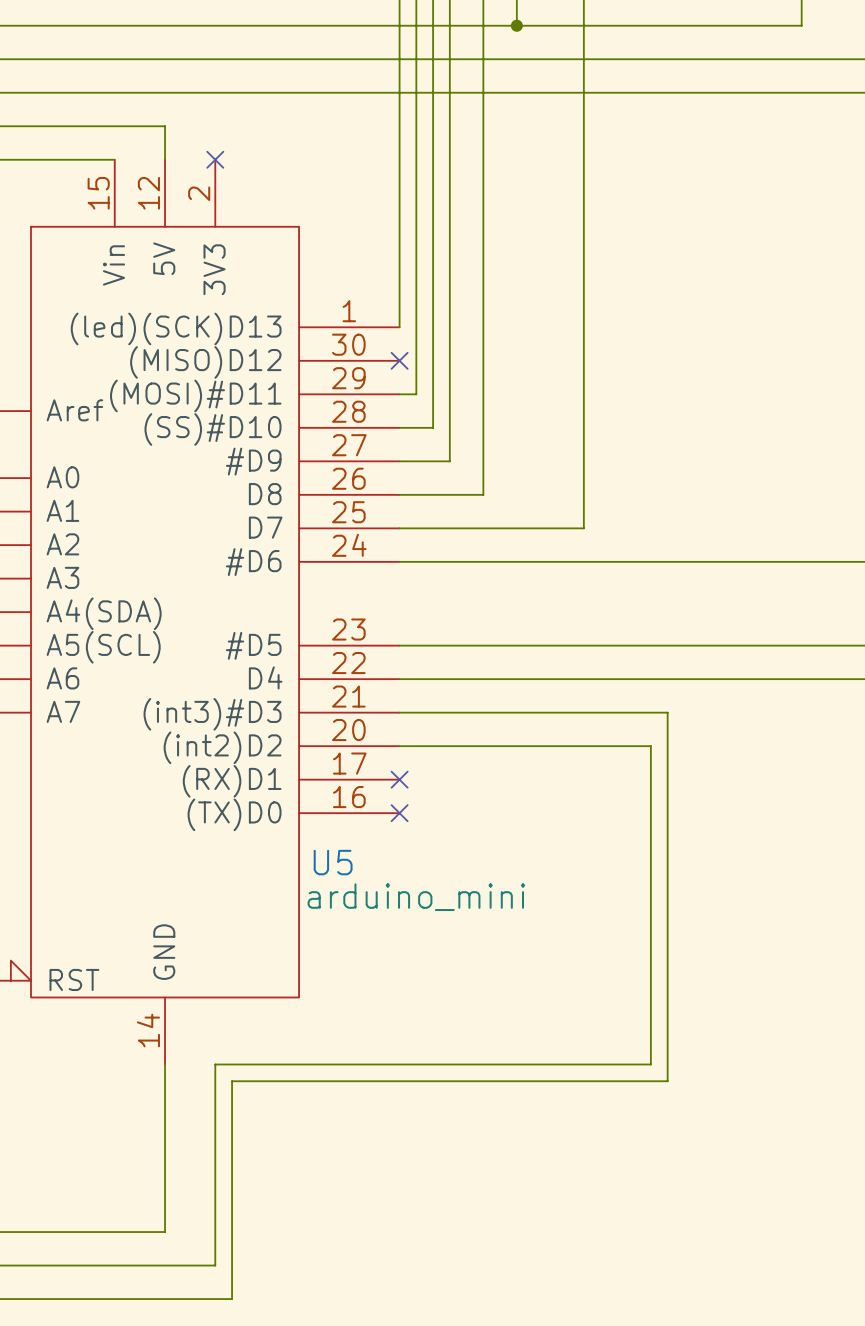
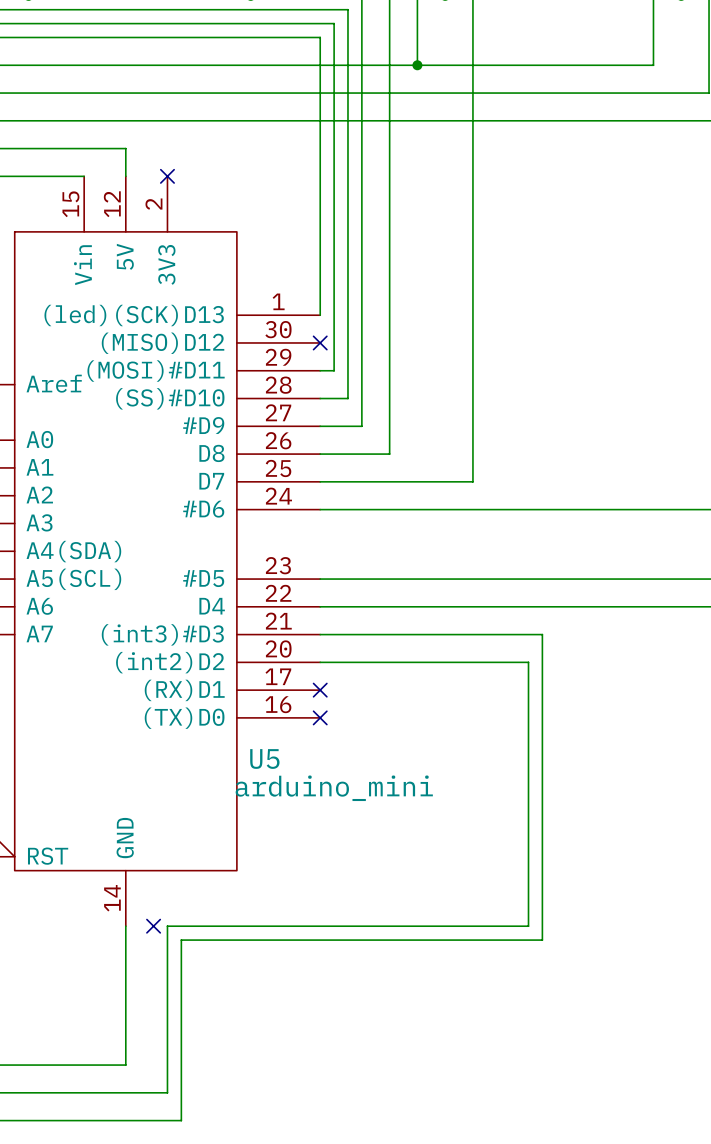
no-connect mark: none -> (153, 926)

